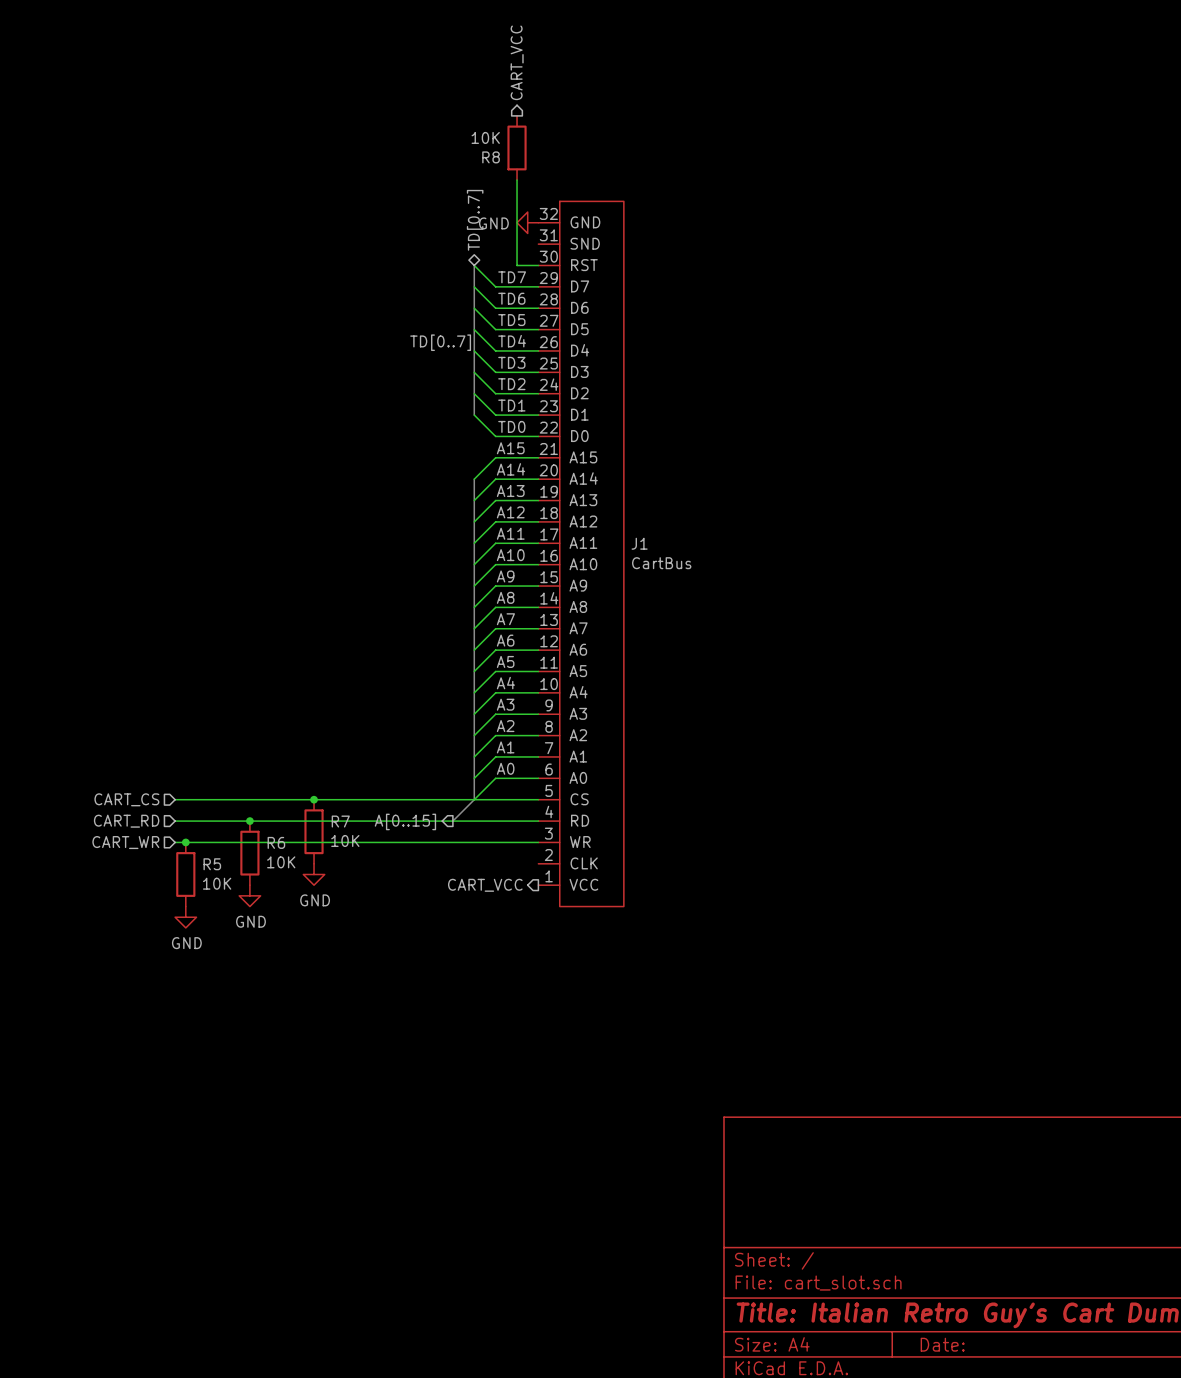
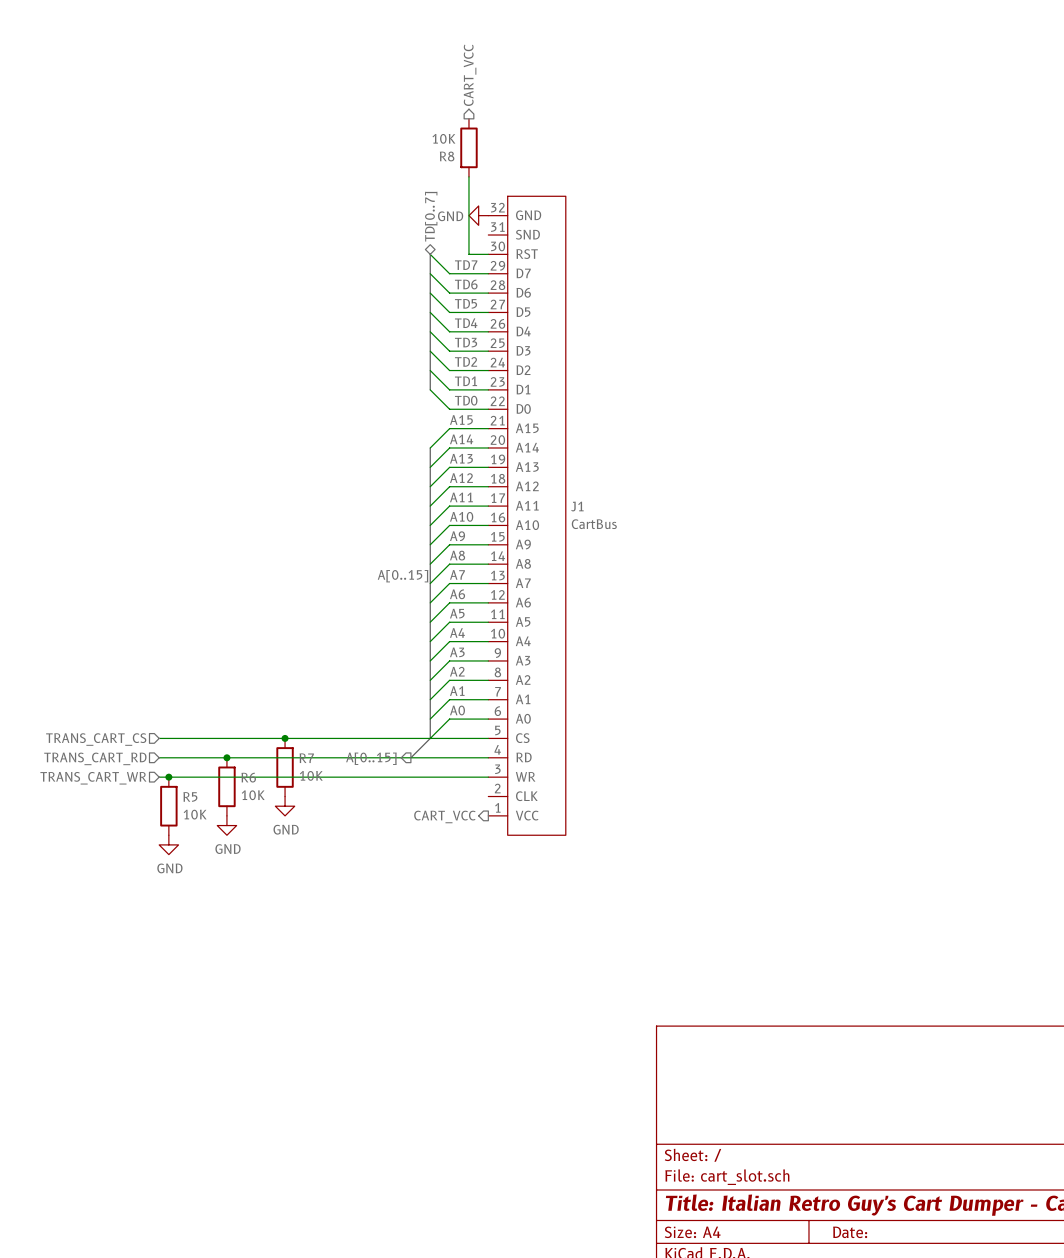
label: TD[0..7] (440, 342) -> none
label: none -> A[0..15] (403, 576)
hierarchical label: CART_CS (126, 799) -> TRANS_CART_CS (96, 739)
hierarchical label: CART_RD (126, 821) -> TRANS_CART_RD (95, 758)
hierarchical label: CART_WR (125, 842) -> TRANS_CART_WR (93, 778)

